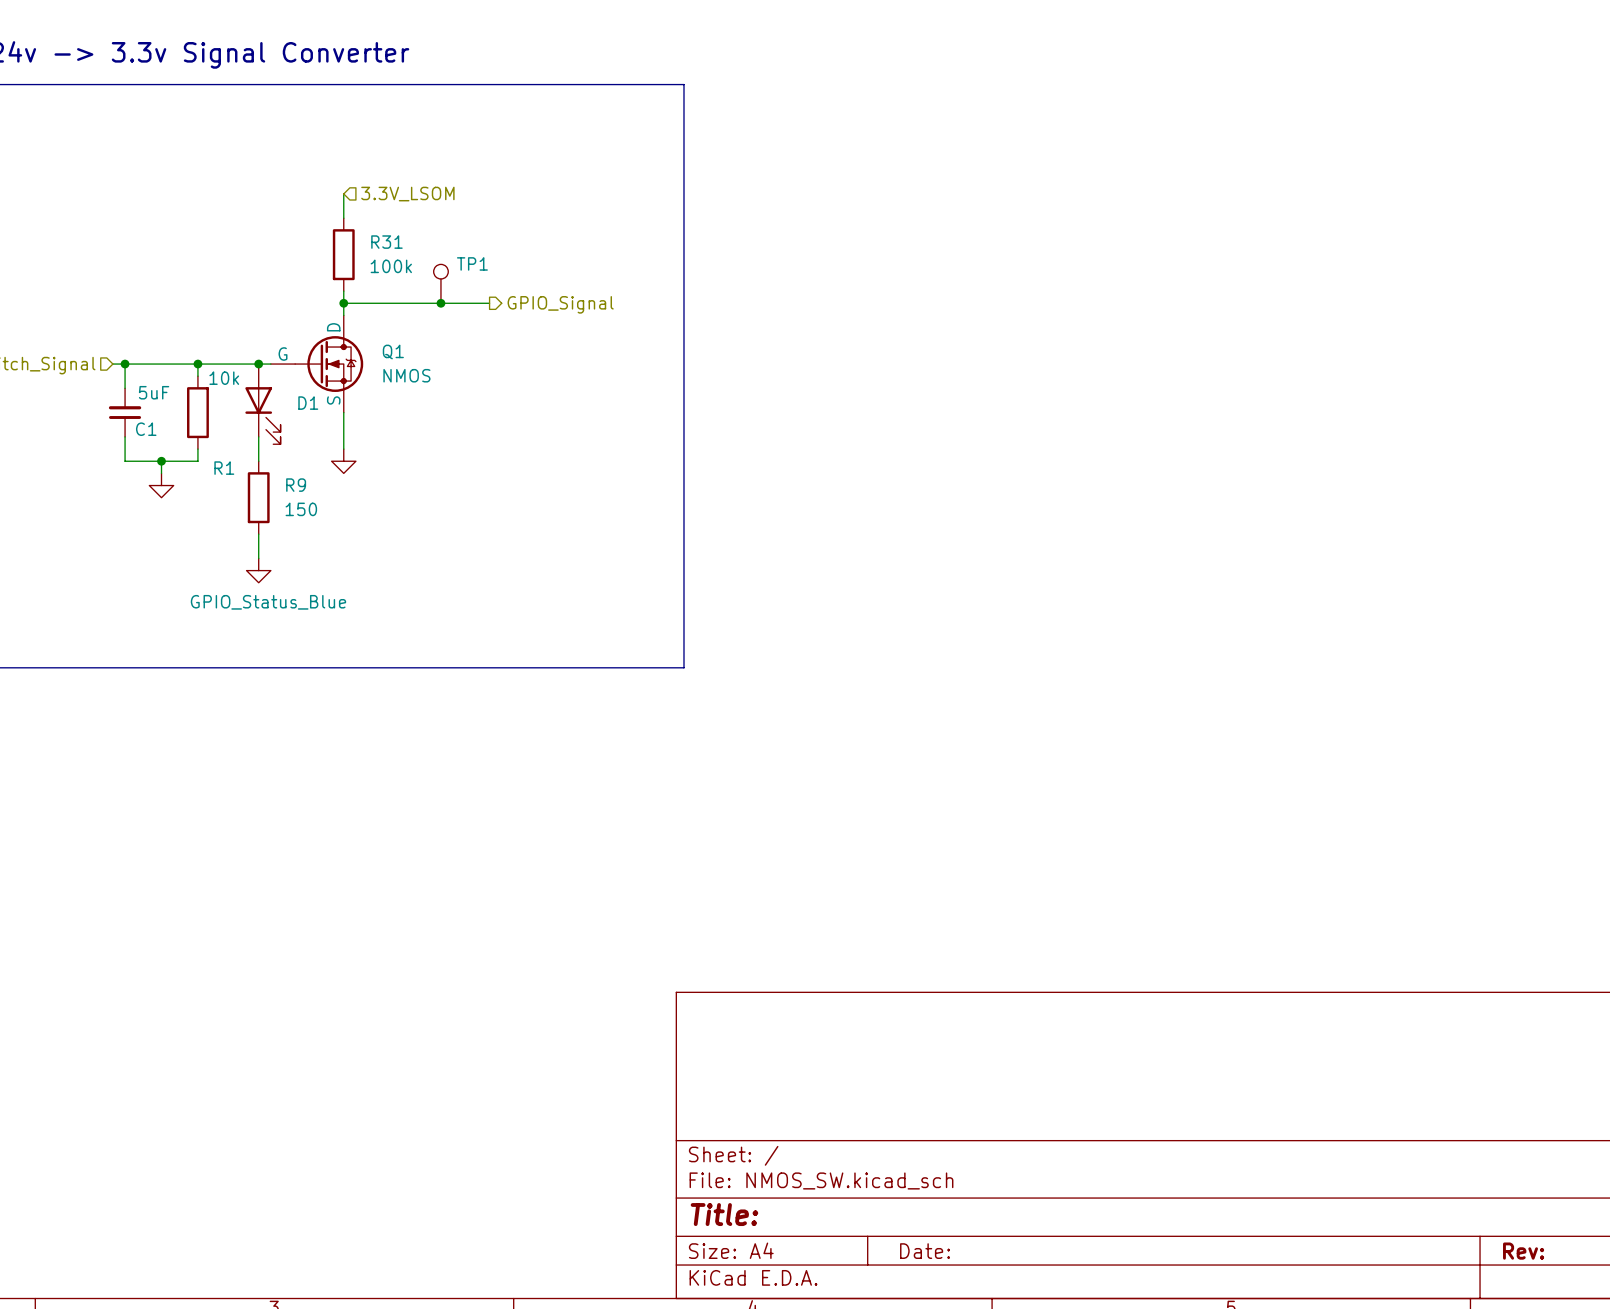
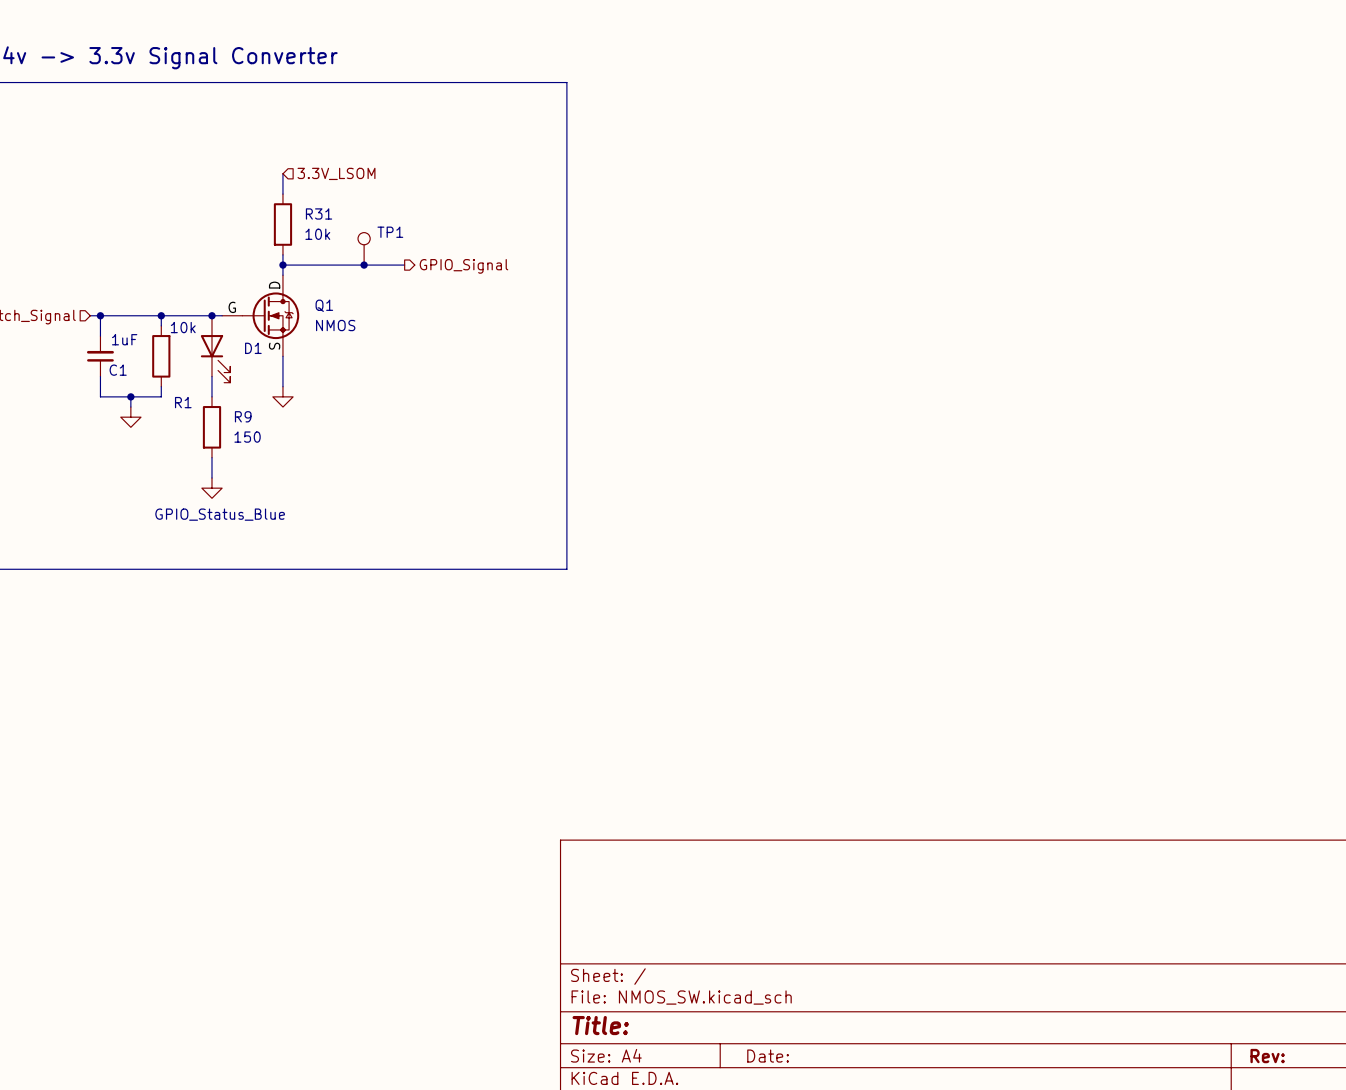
R31 value: 100k (391, 266) -> 10k (317, 234)
C1 value: 5uF (154, 392) -> 1uF (124, 339)

